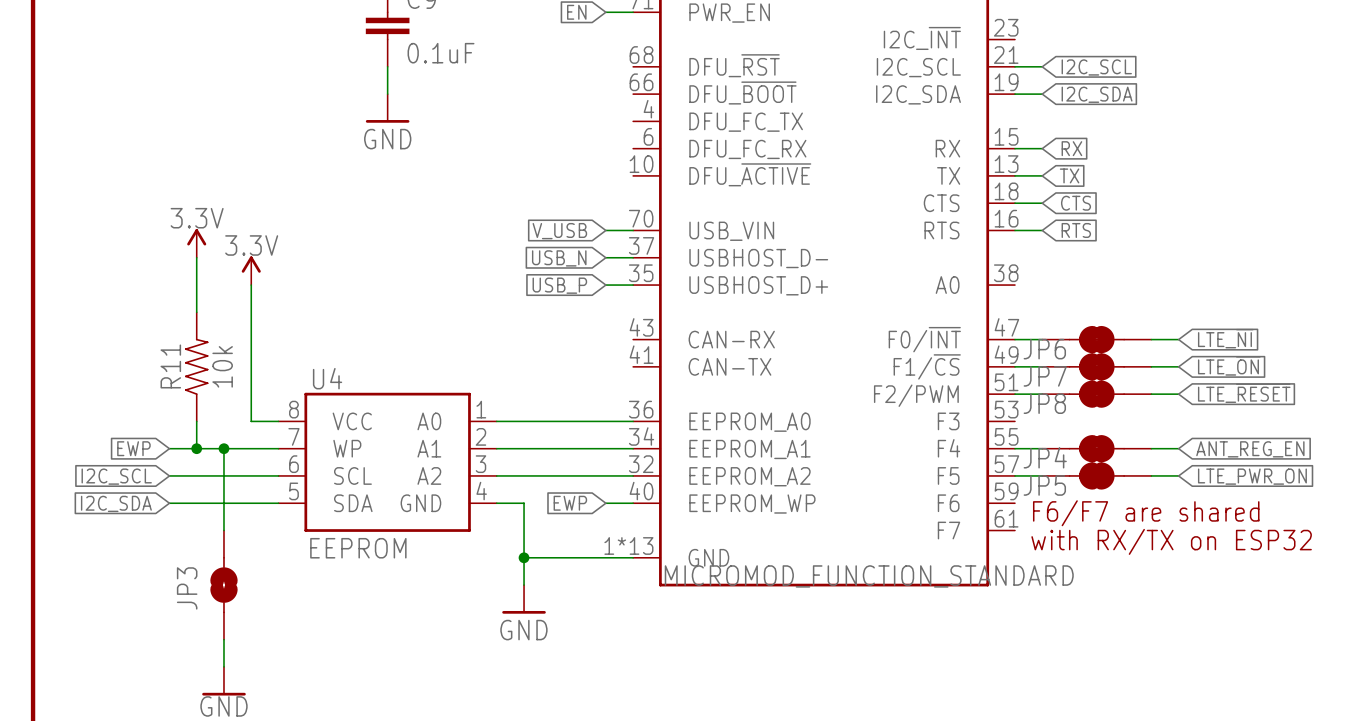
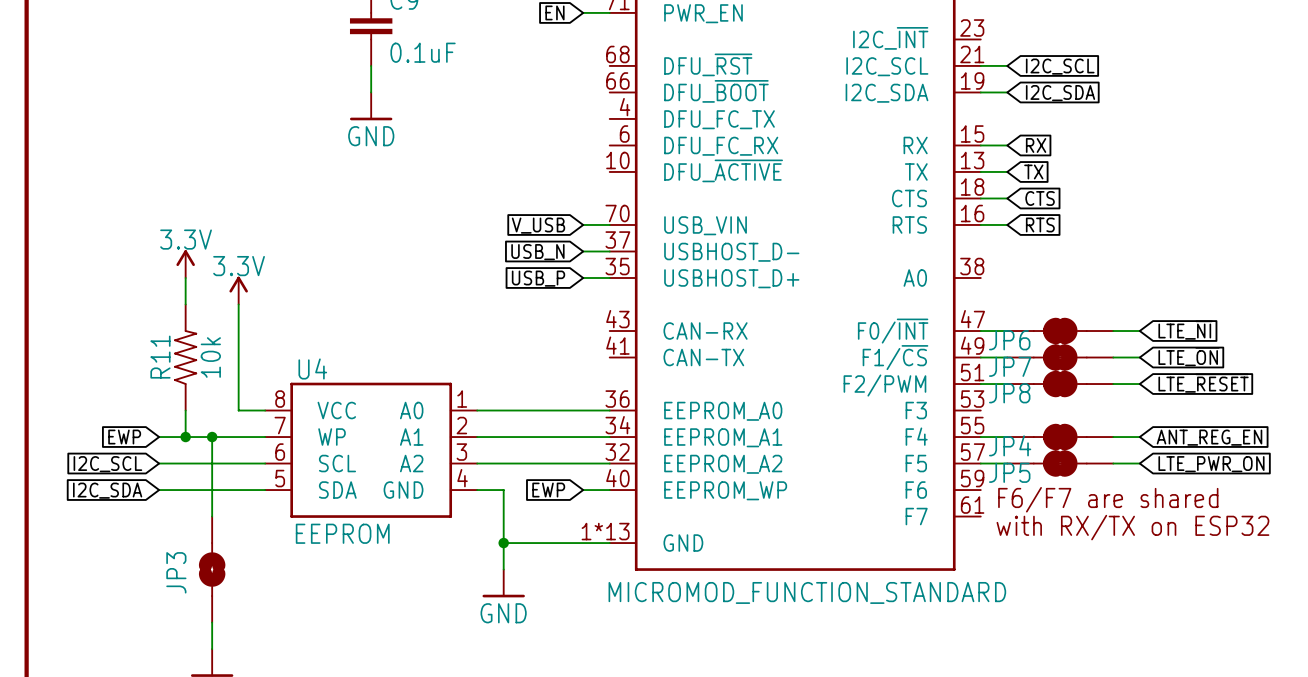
power symbol: 3.3V (196, 243) -> none
power symbol: none -> 3.3V (185, 264)
power symbol: 3.3V (251, 270) -> none
power symbol: none -> 3.3V (238, 290)
part value position: MICROMOD_FUNCTION_STANDARD (869, 576) -> MICROMOD_FUNCTION_STANDARD (807, 592)

